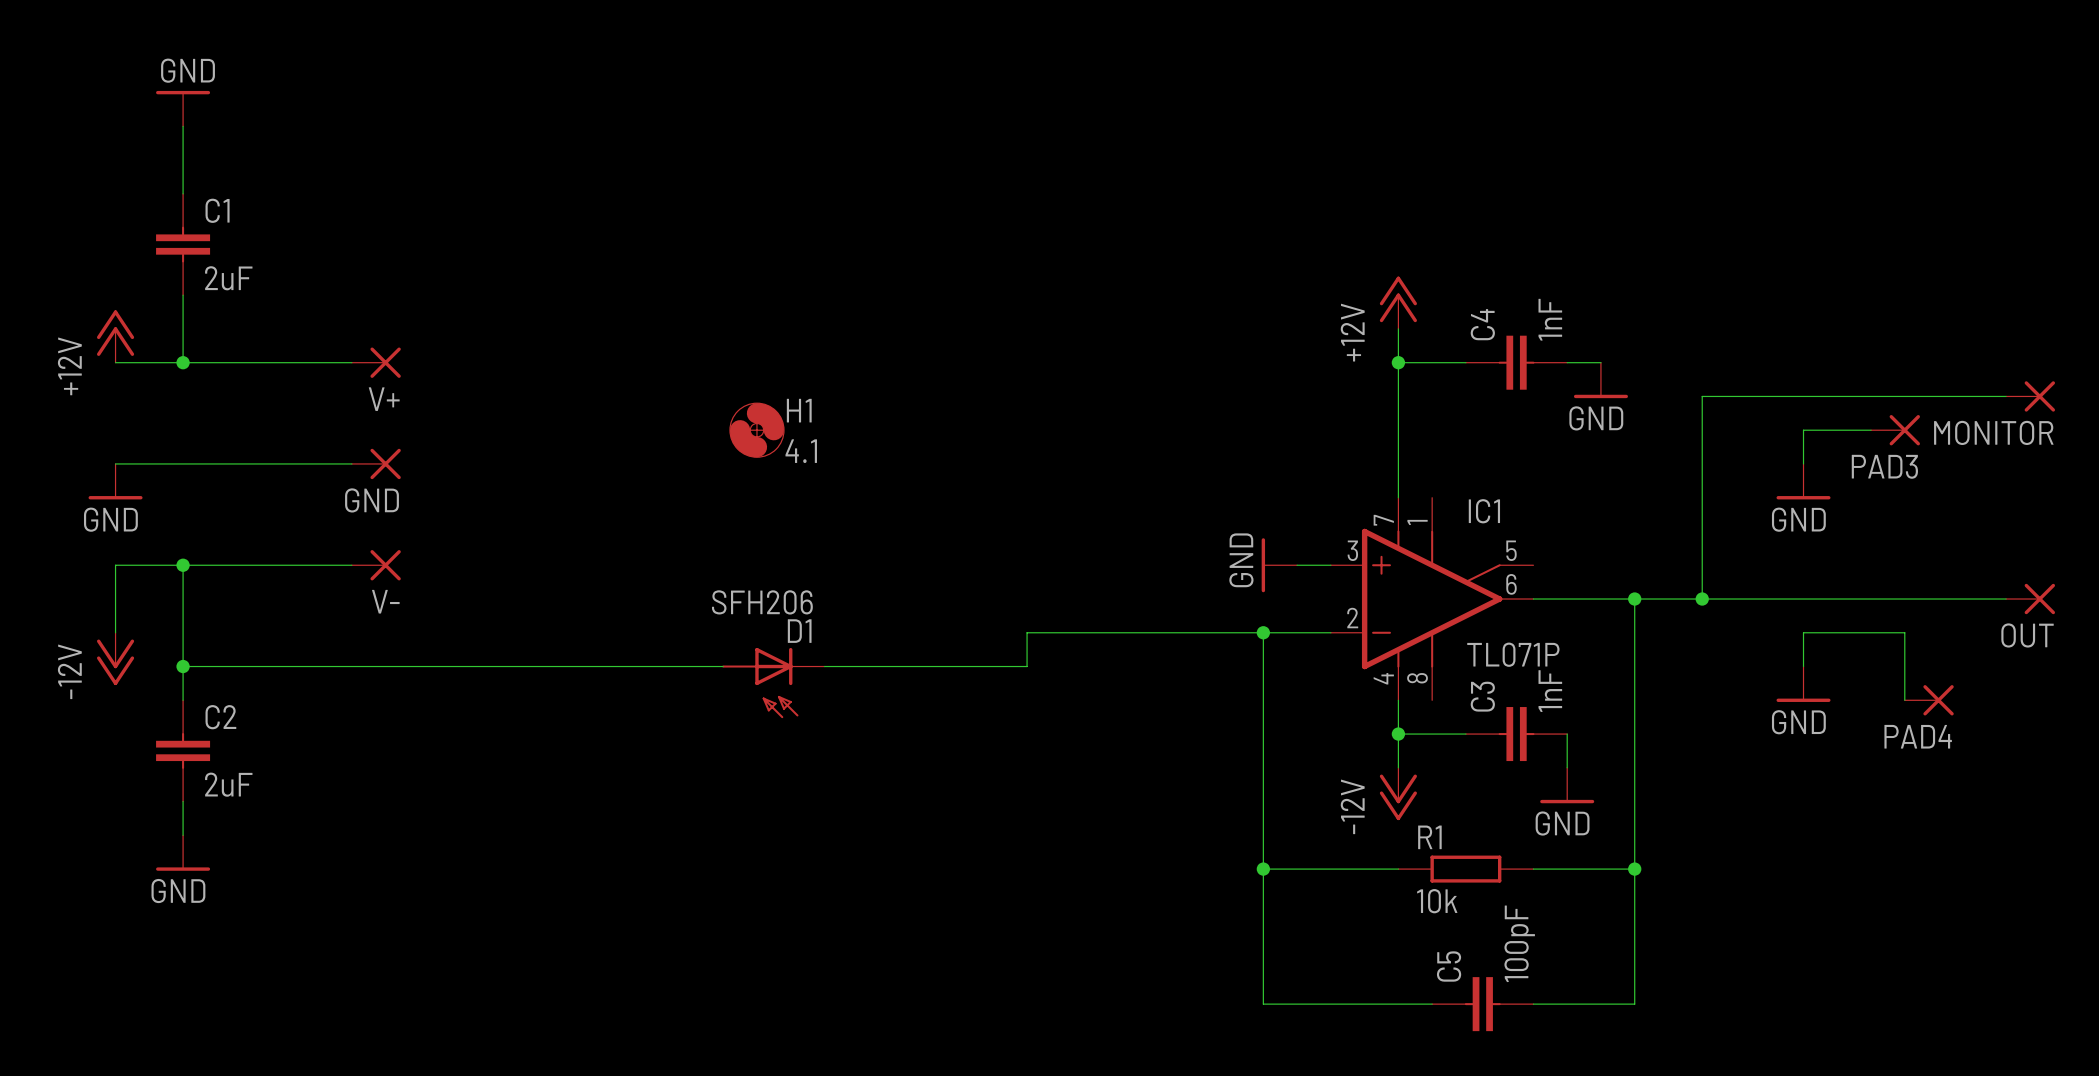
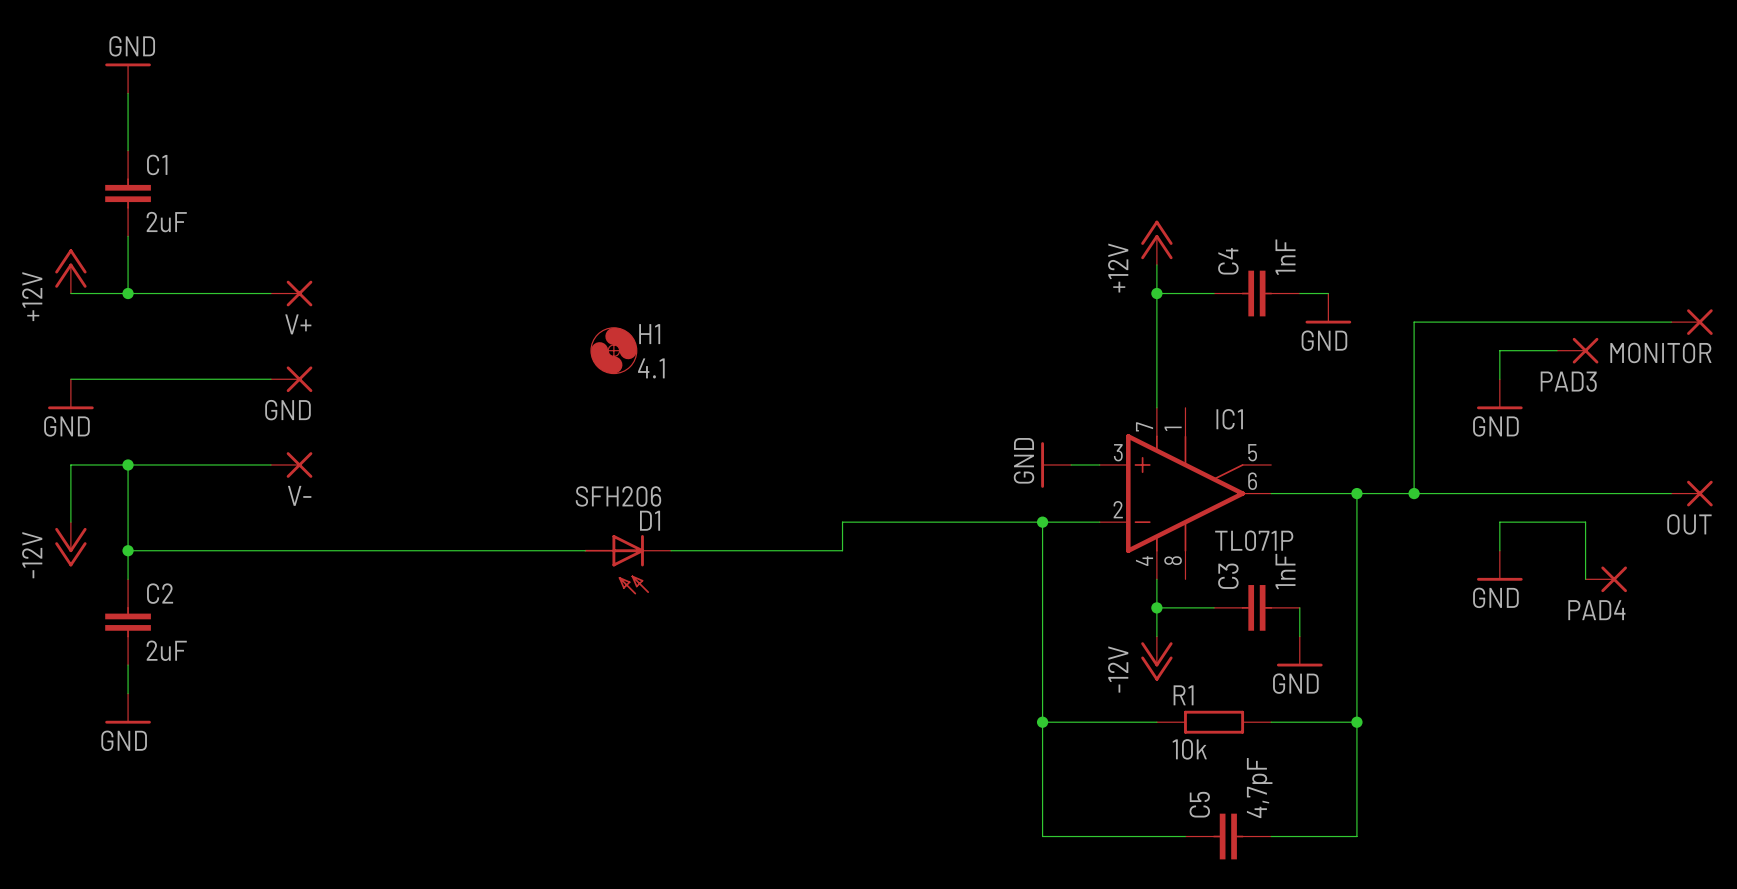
C5 value: 100pF (1519, 943) -> 4,7pF (1259, 788)

